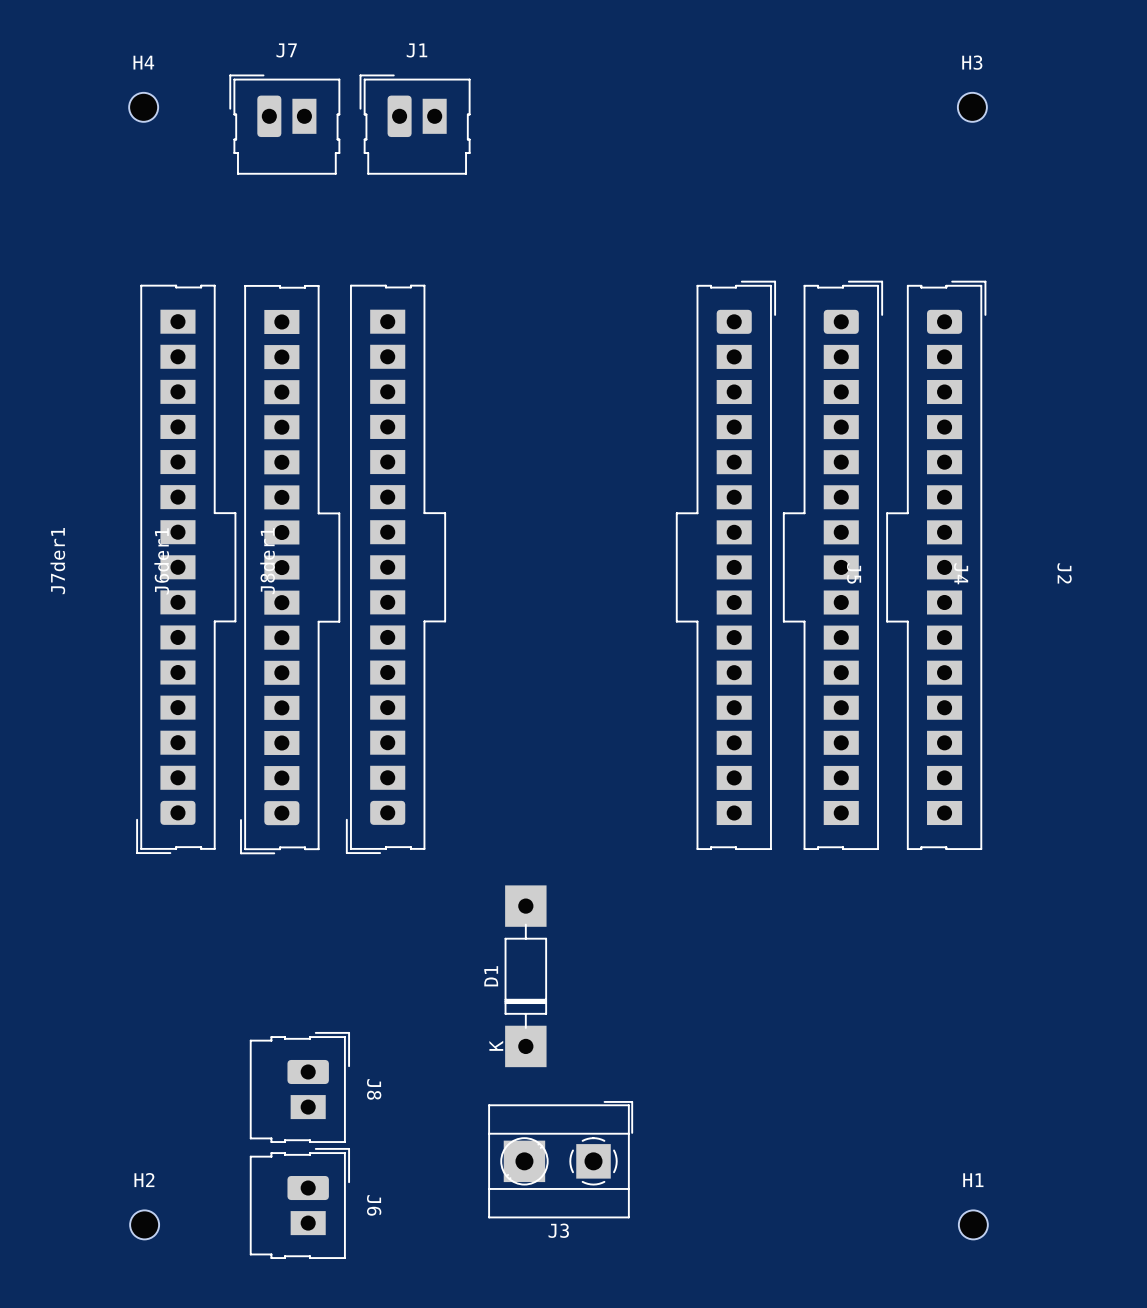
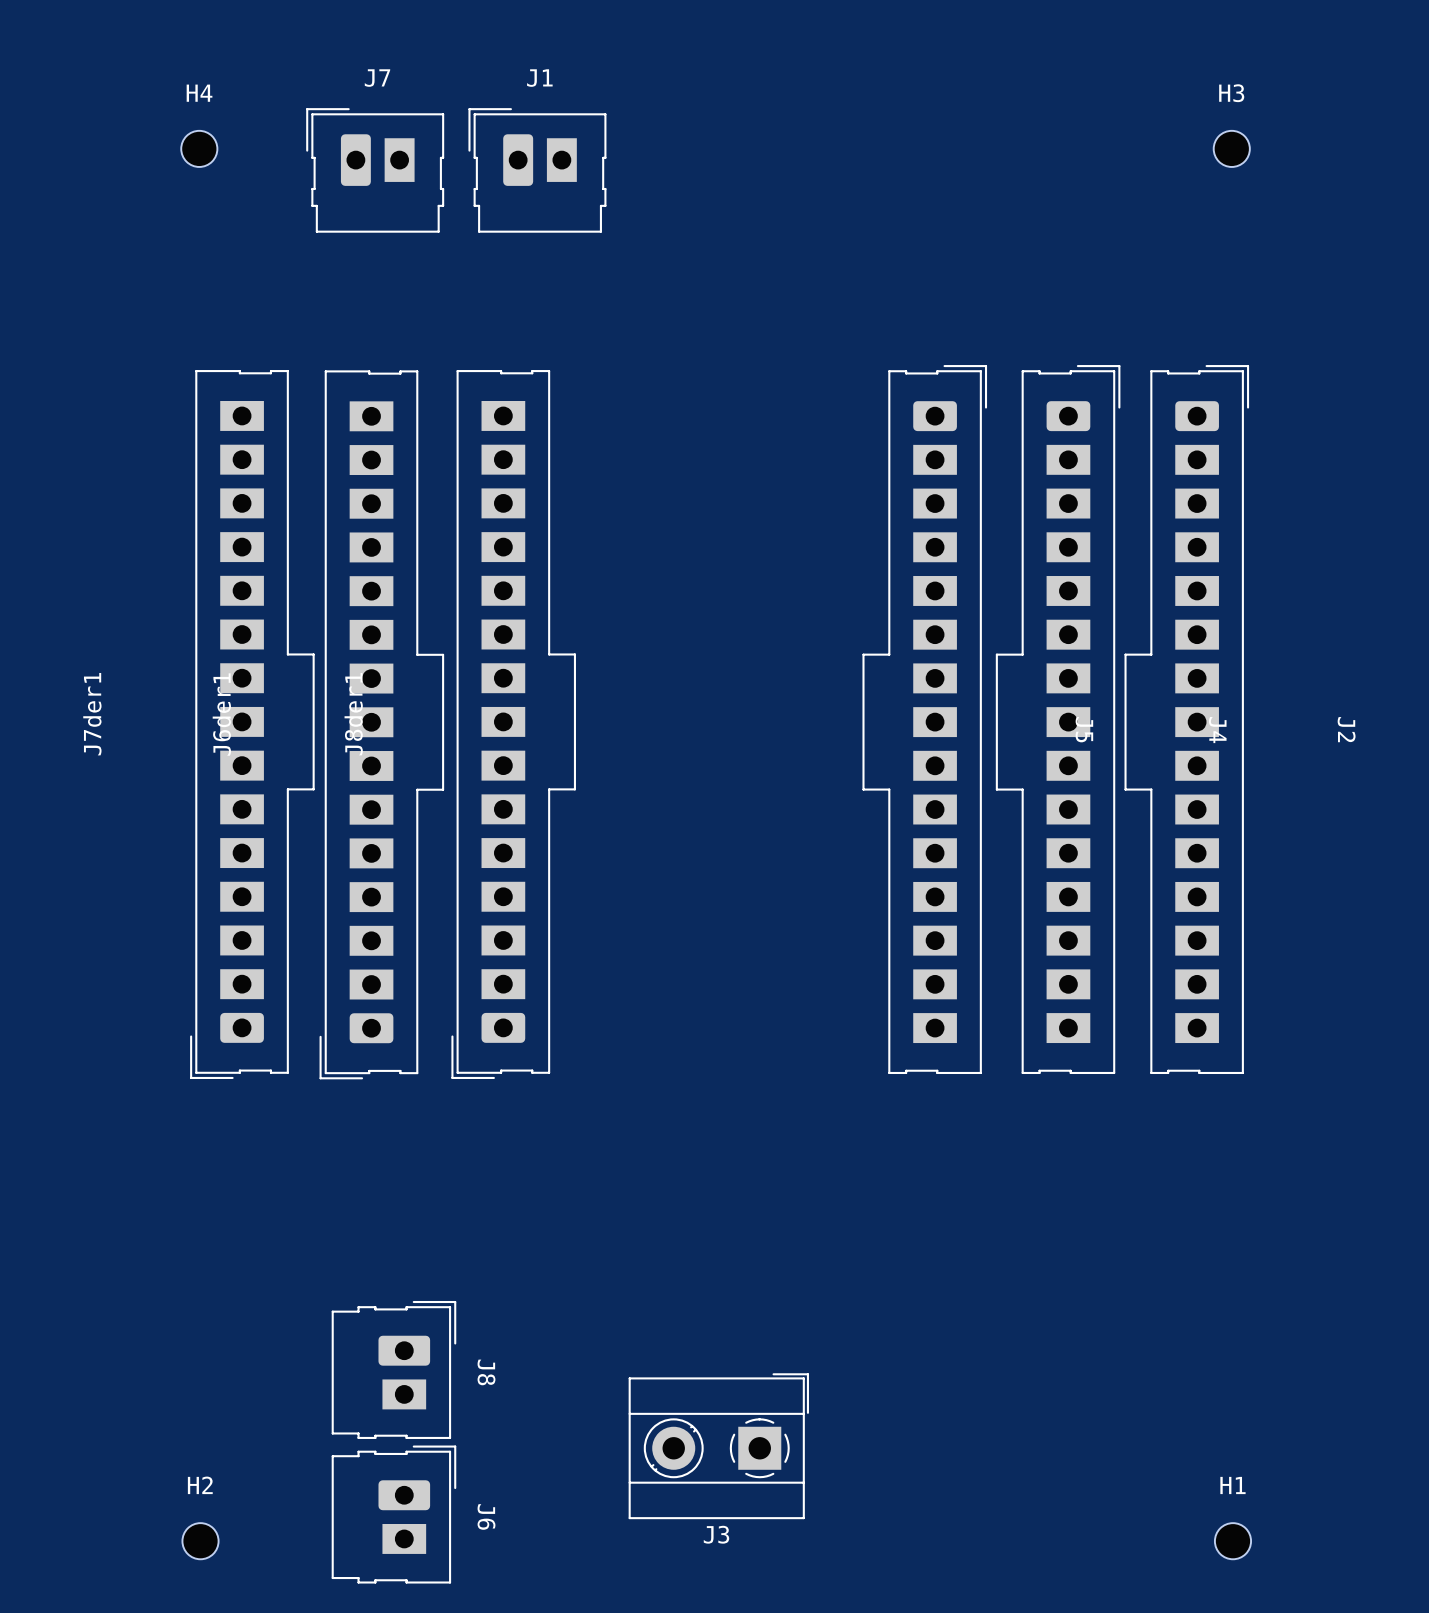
D1: (525, 976) -> none
J3 footprint: [488, 1101, 634, 1219] -> [628, 1373, 809, 1520]

